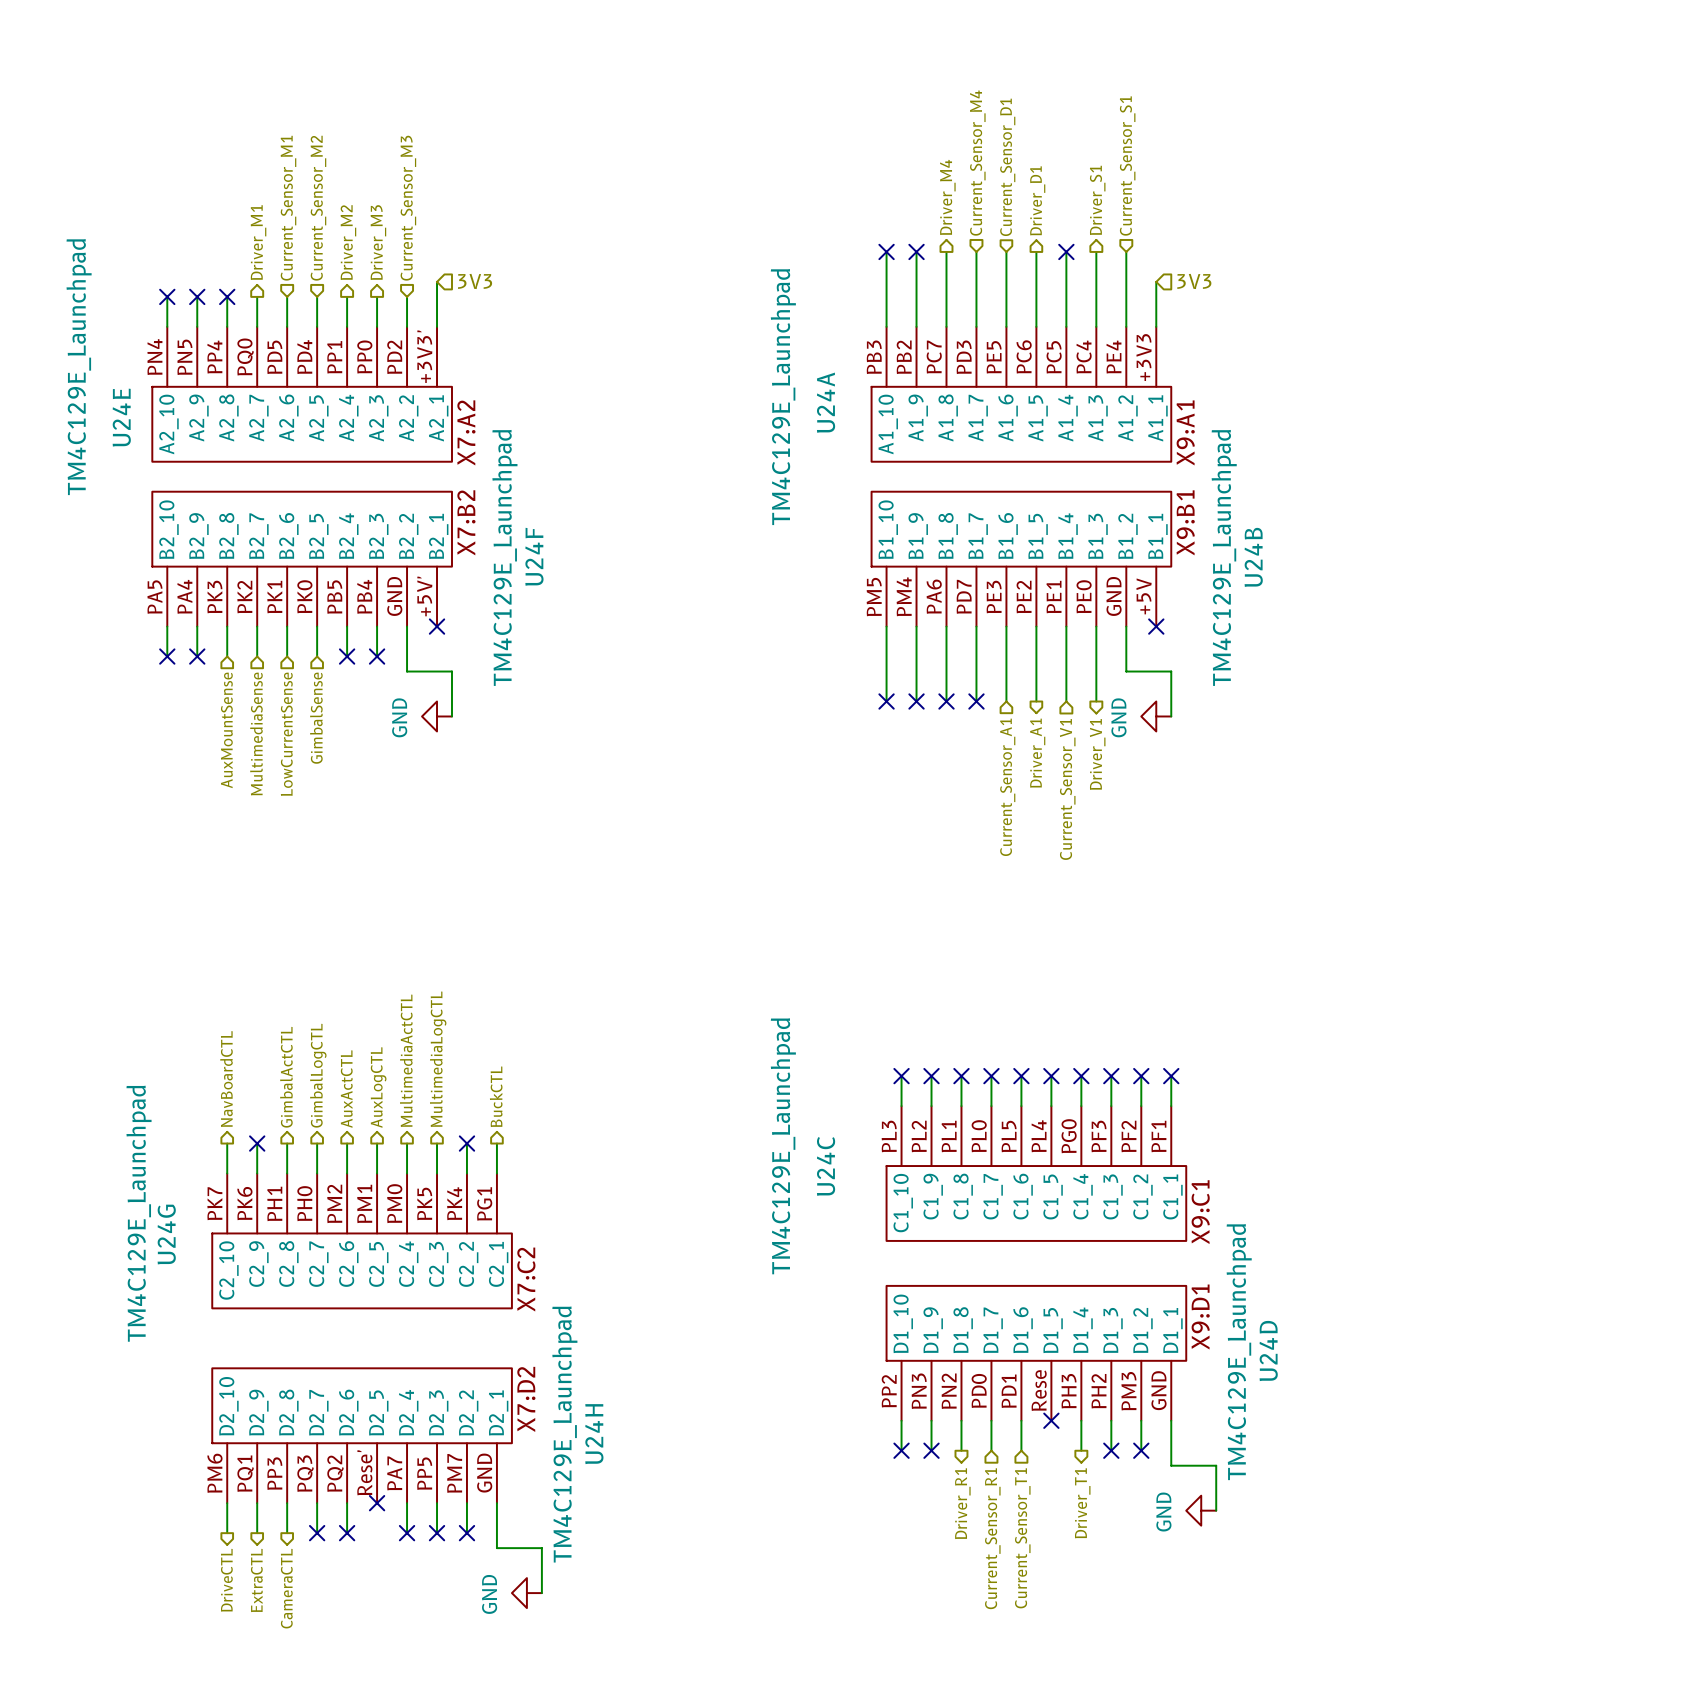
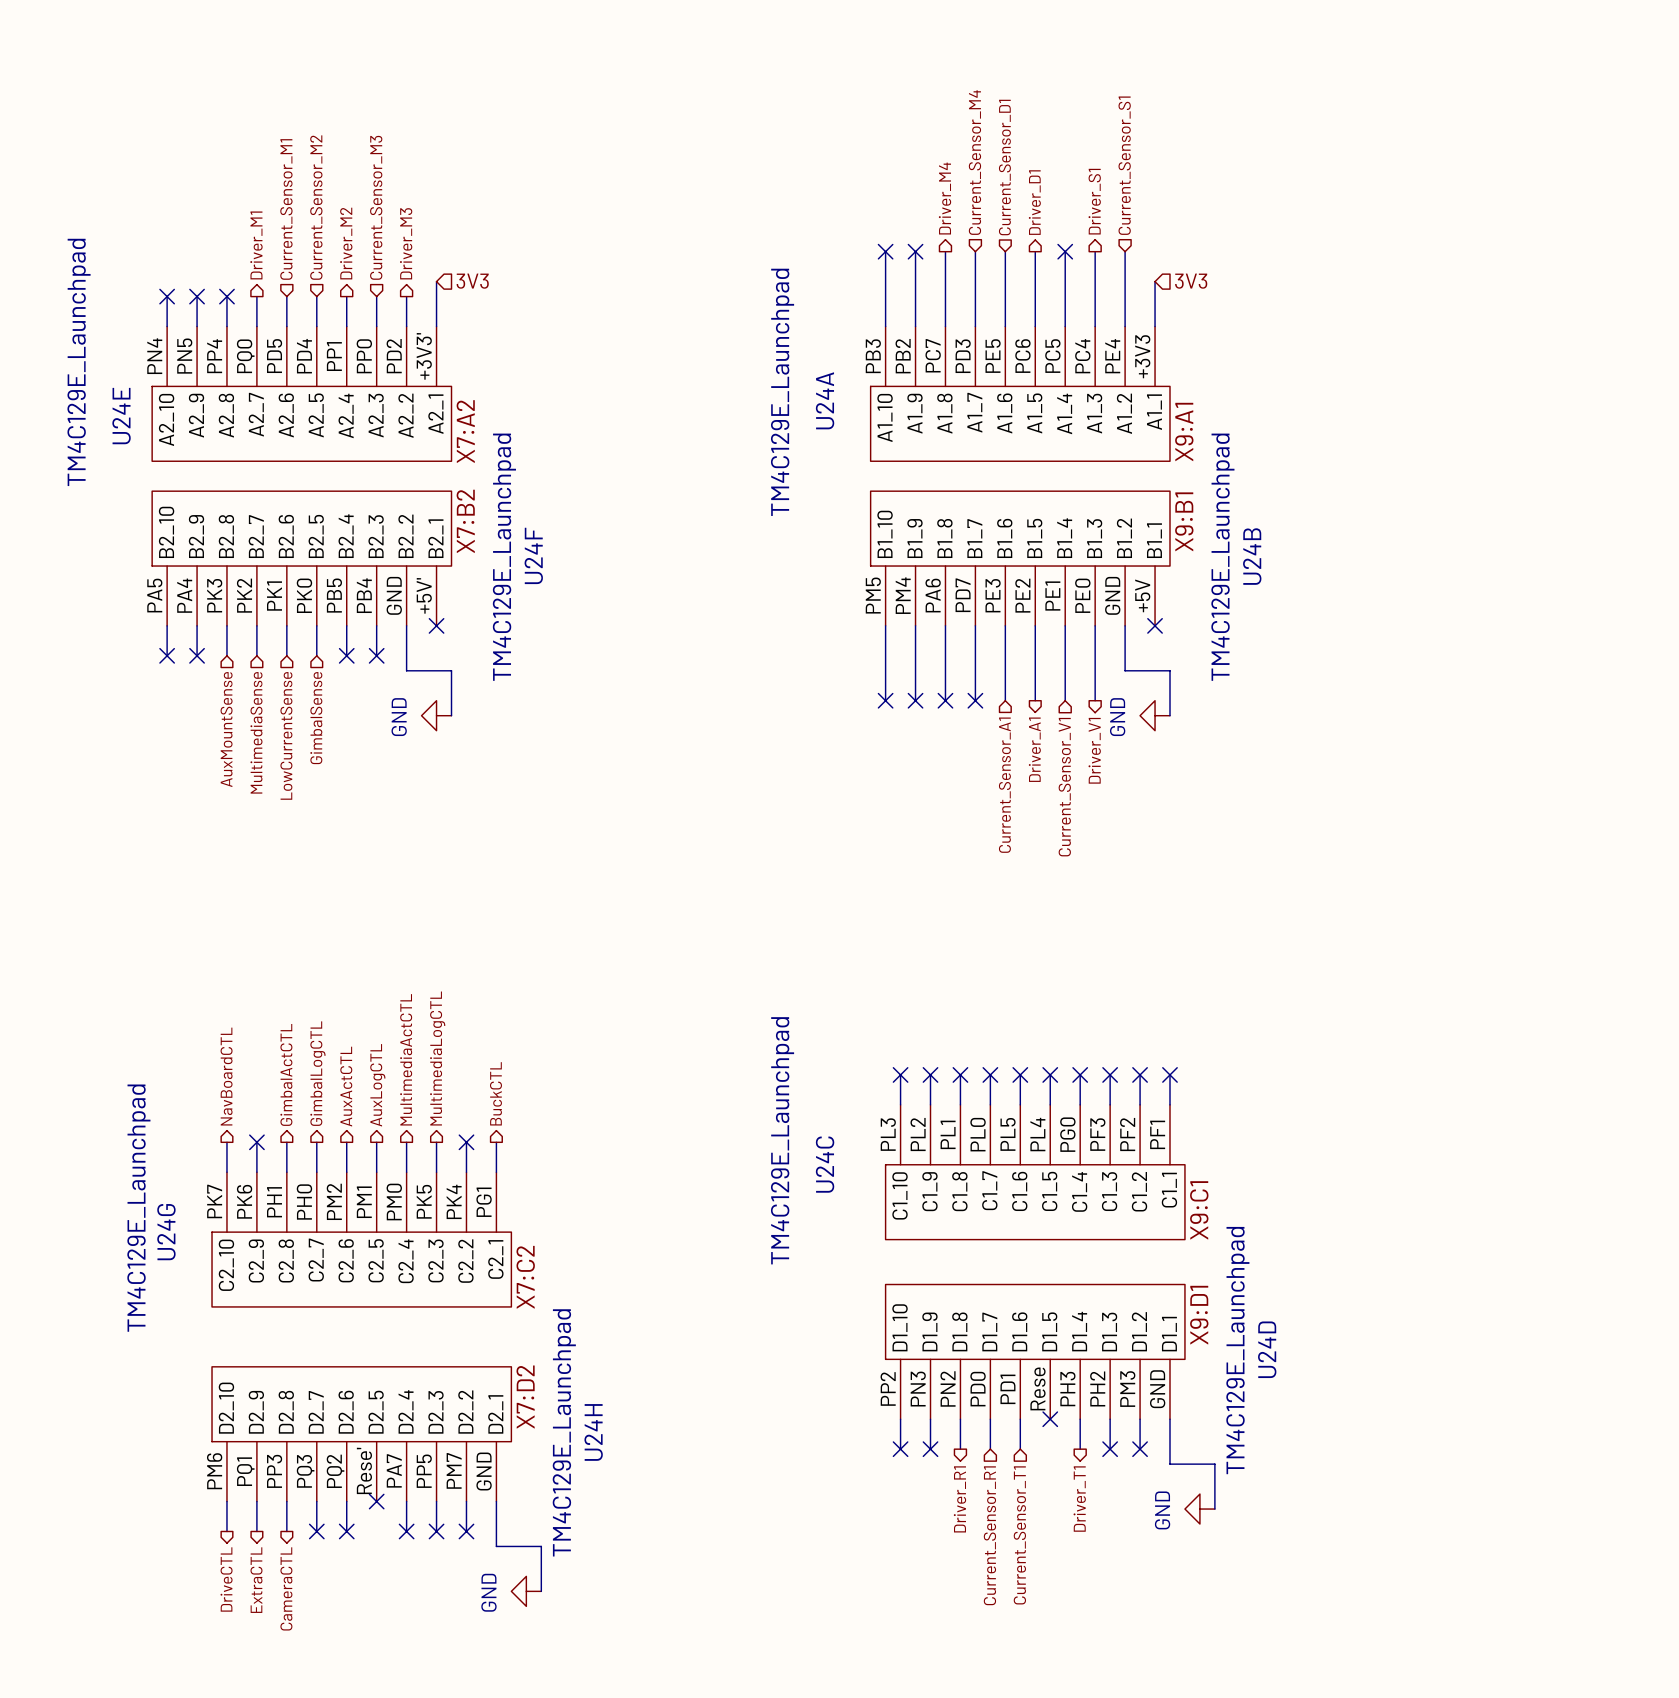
hierarchical label shape: input (408, 208) -> output (406, 243)
hierarchical label: Current_Sensor_M3 (408, 208) -> Driver_M3 (406, 243)
hierarchical label shape: output (378, 242) -> input (376, 207)
hierarchical label: Driver_M3 (378, 242) -> Current_Sensor_M3 (376, 207)

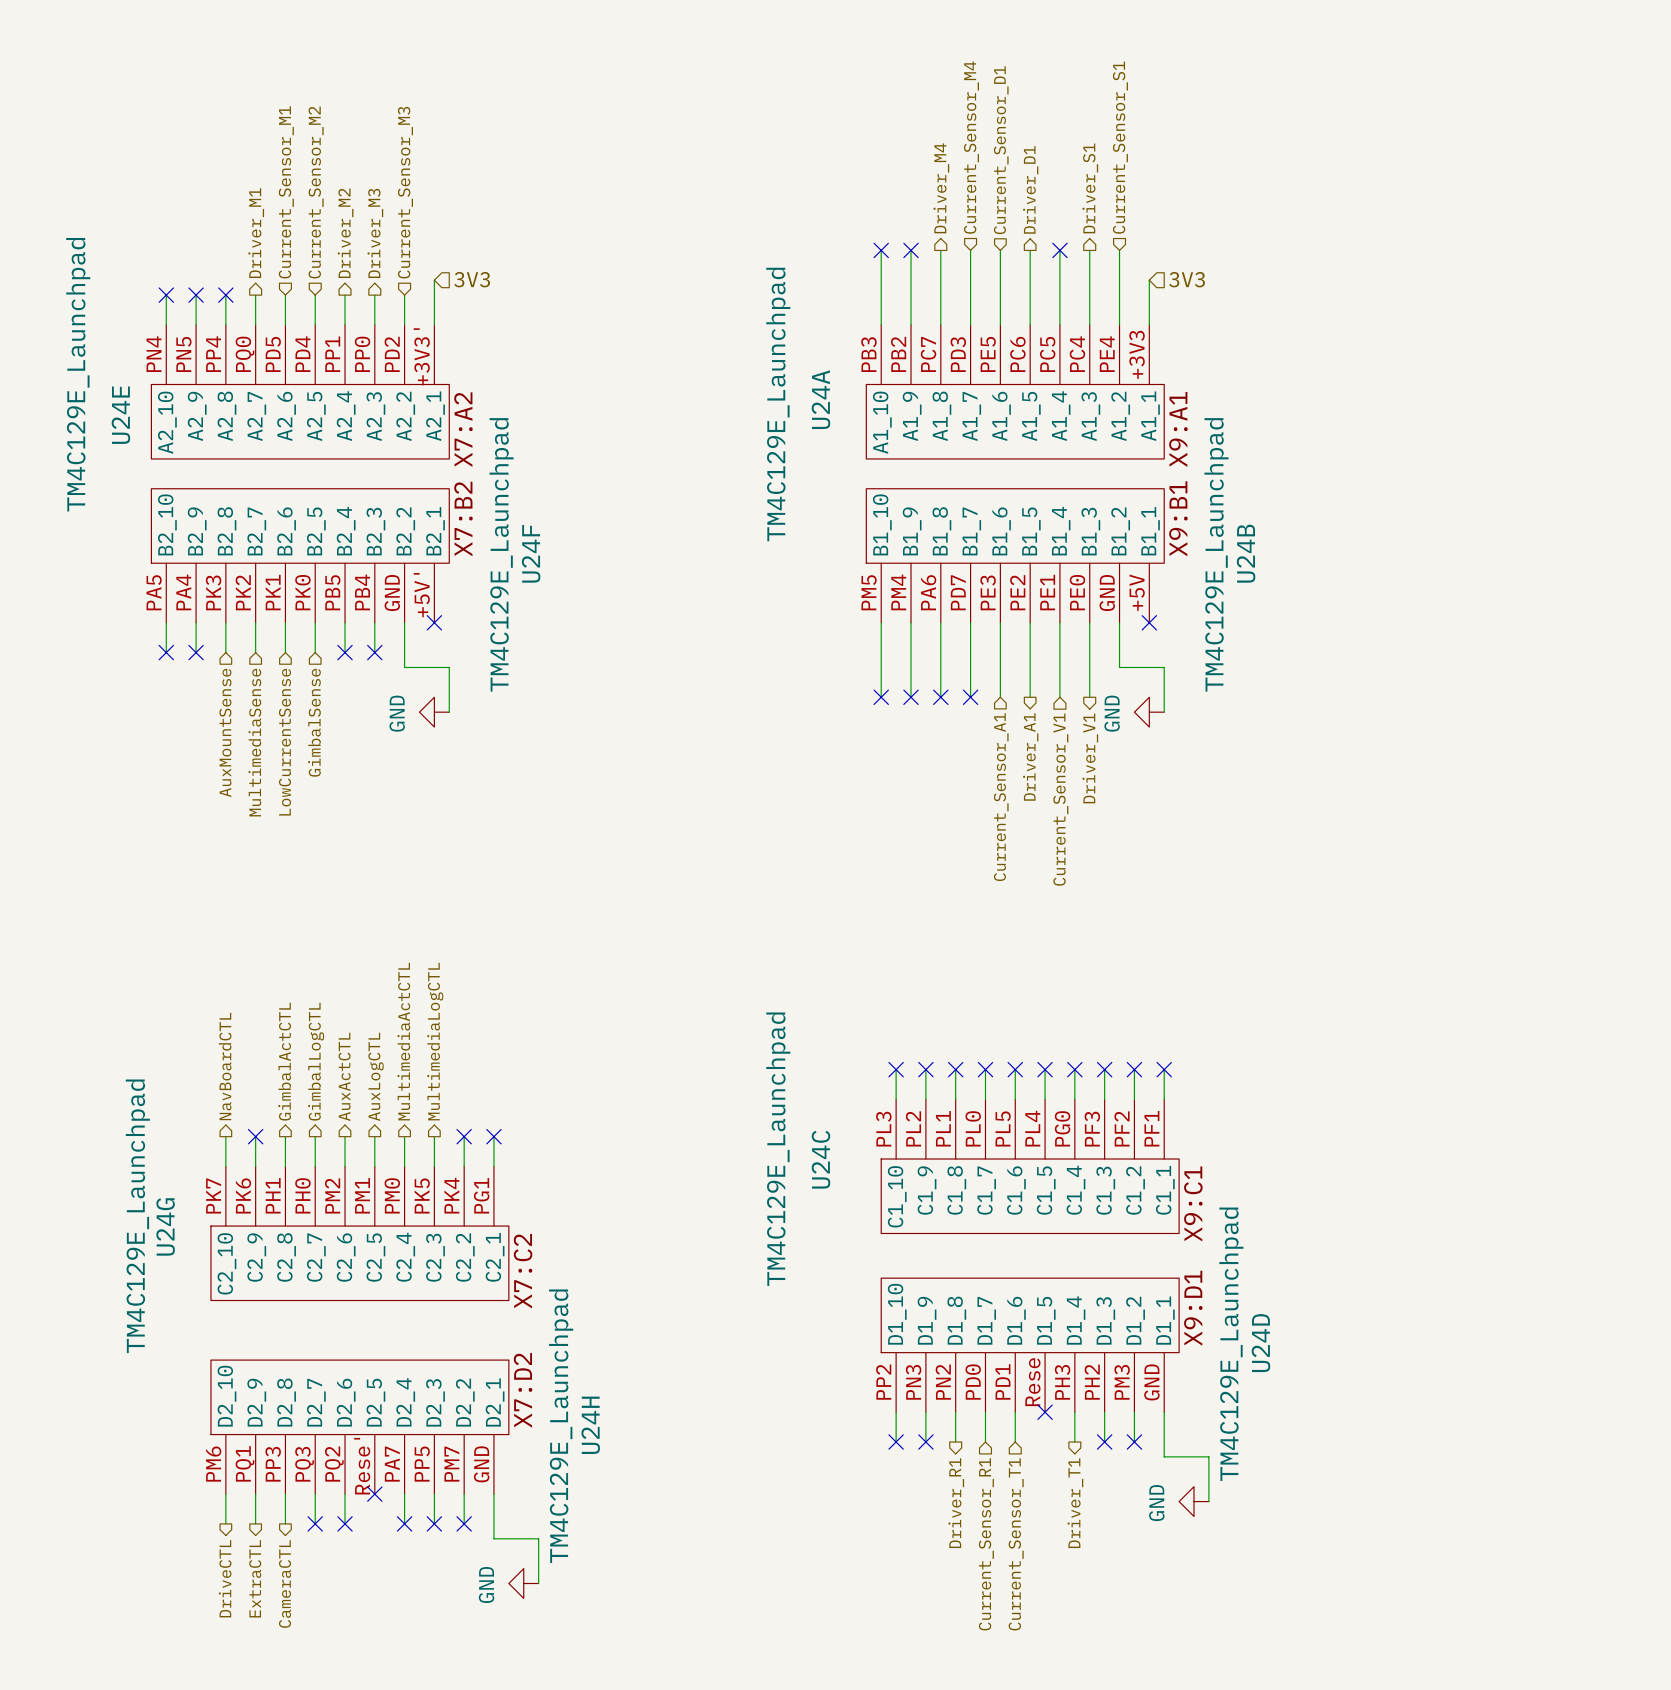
hierarchical label shape: input (376, 207) -> output (375, 233)
hierarchical label: Current_Sensor_M3 (376, 207) -> Driver_M3 (375, 233)
hierarchical label shape: output (406, 243) -> input (405, 192)
hierarchical label: Driver_M3 (406, 243) -> Current_Sensor_M3 (405, 192)
hierarchical label: BuckCTL (495, 1093) -> none
no-connect mark: none -> (493, 1136)

